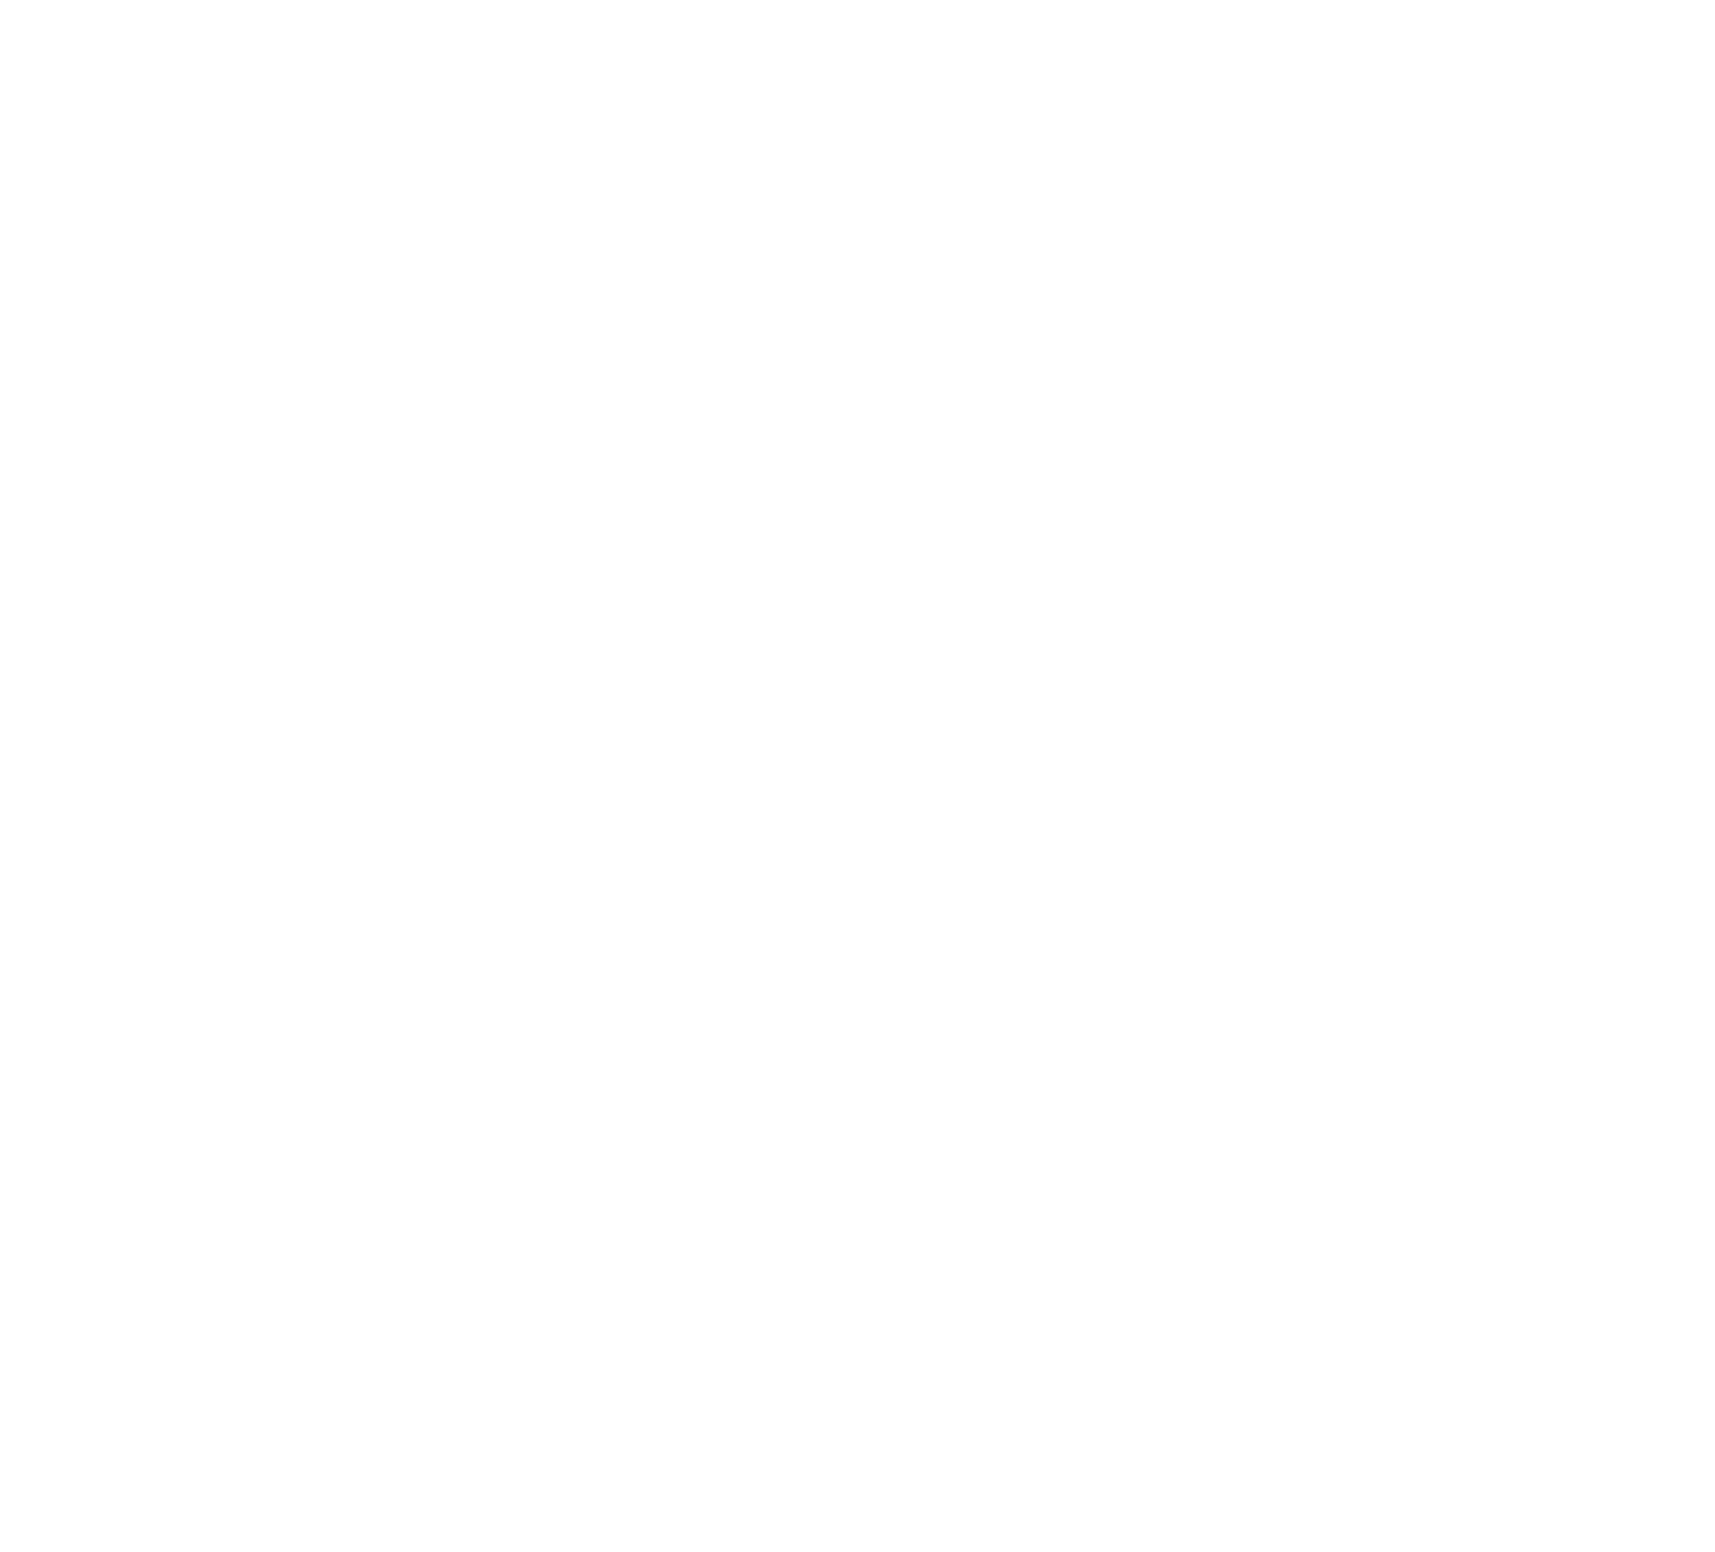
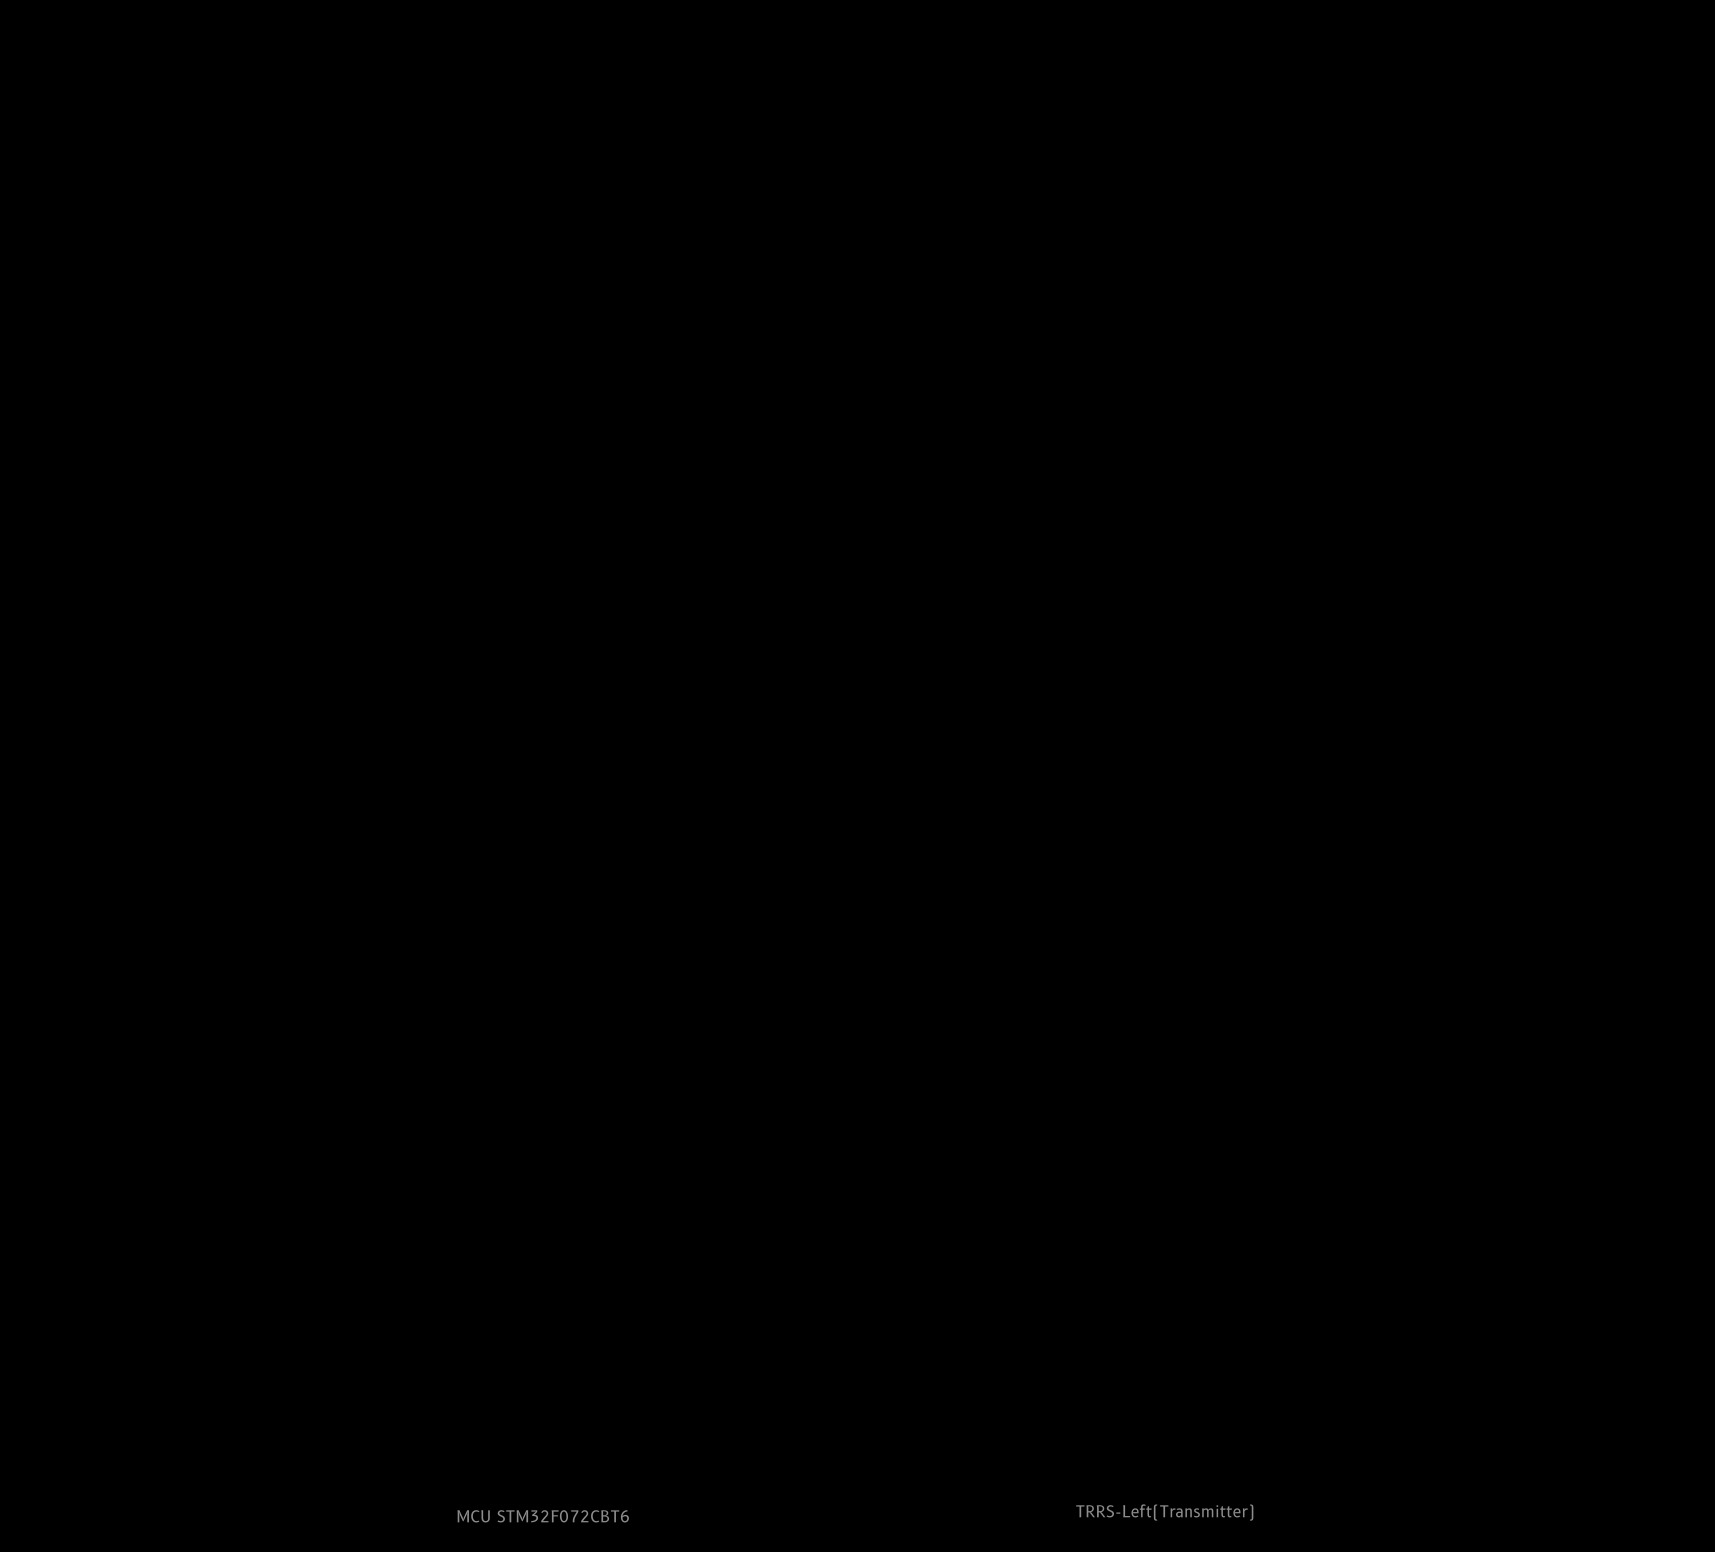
text: none -> TRRS-Left(Transmitter) (1164, 1512)
text: none -> MCU STM32F072CBT6 (543, 1516)

